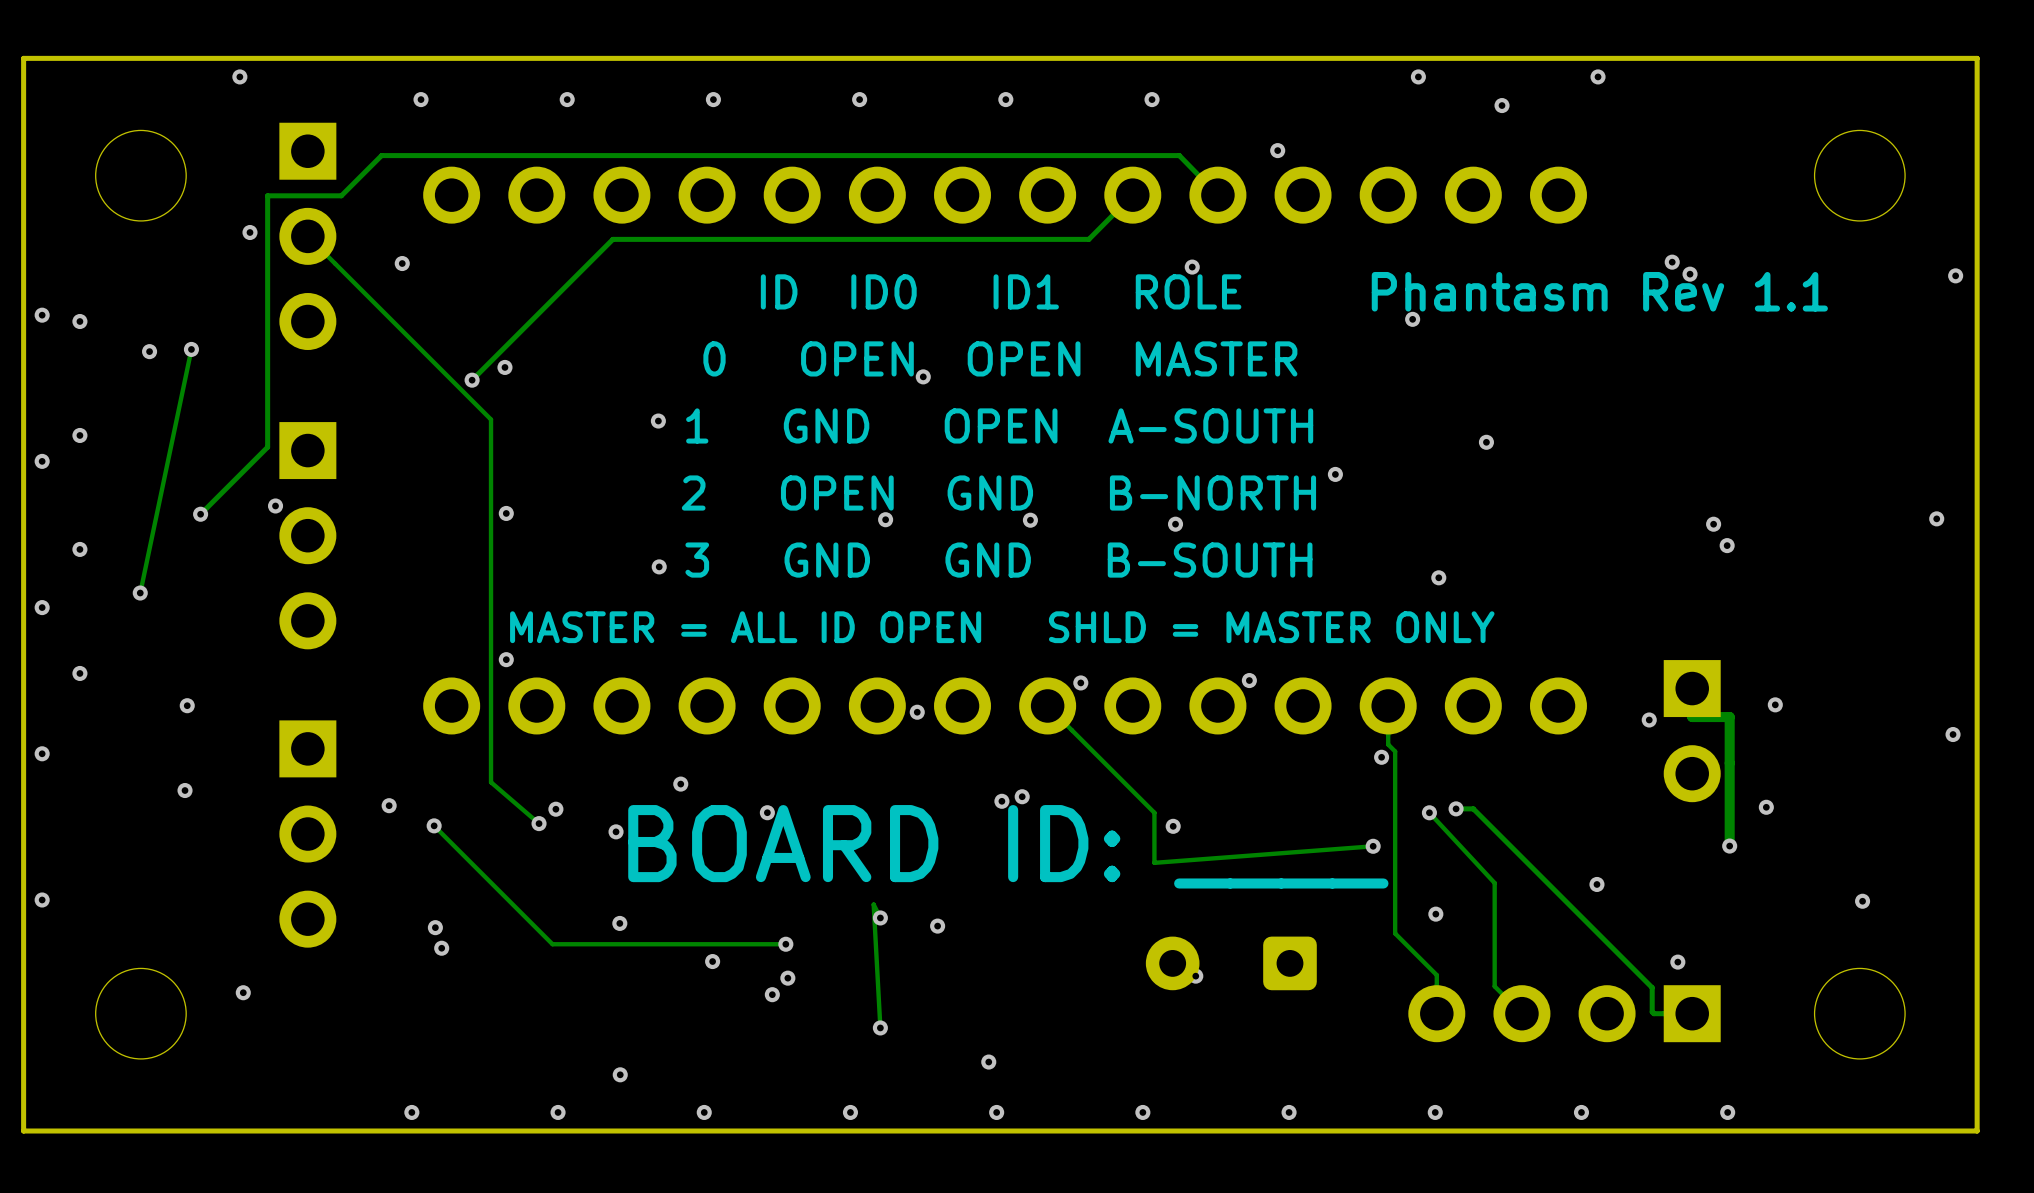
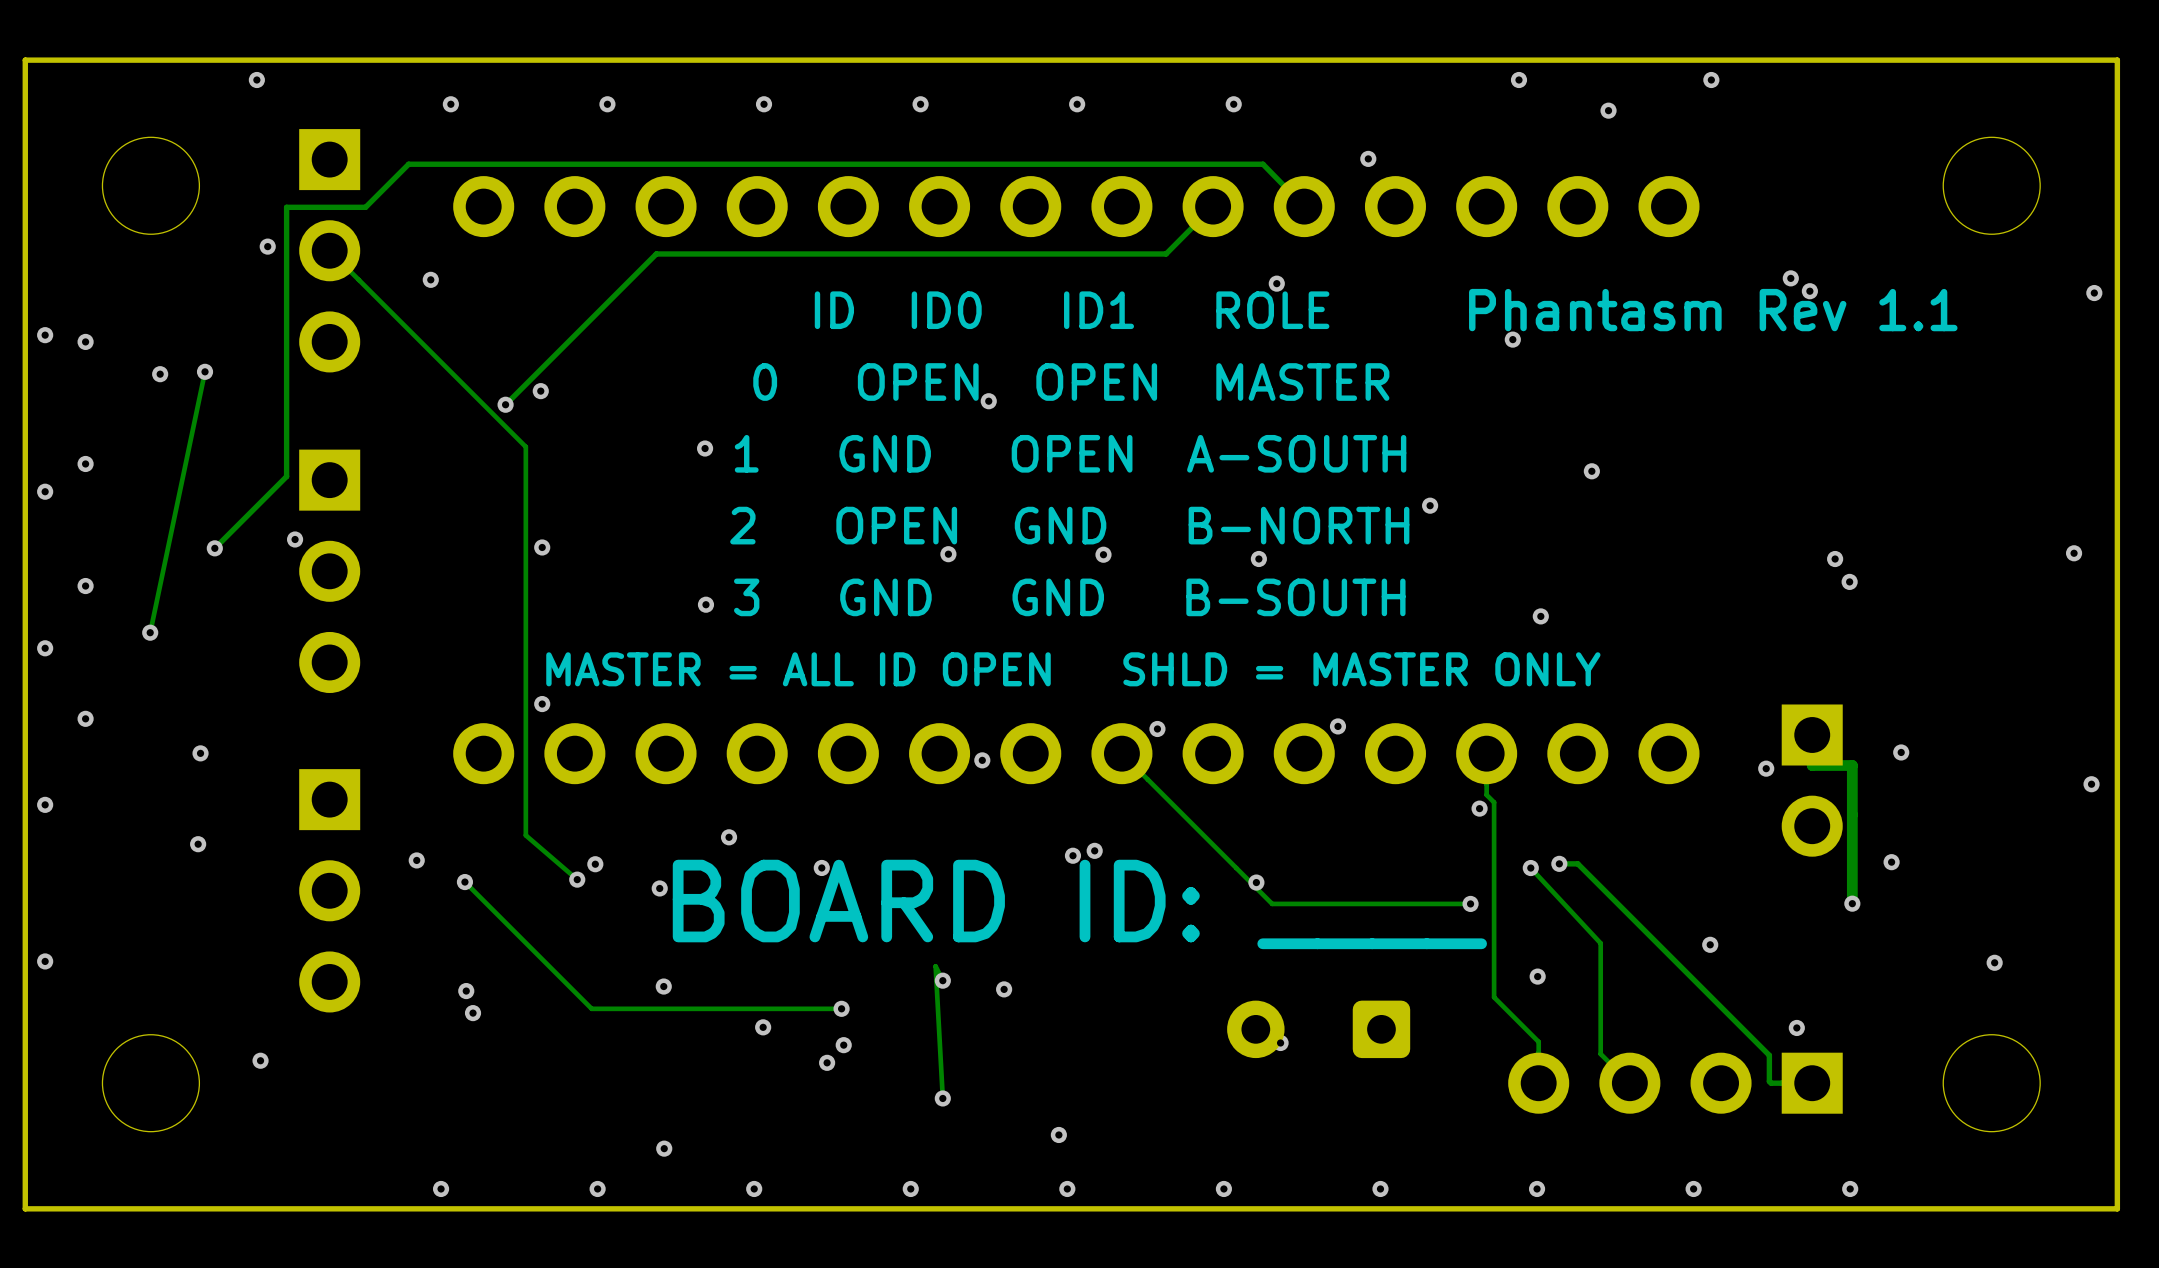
track: (1154, 812) (1154, 862) (1373, 846) -> (1236, 868) (1272, 903) (1470, 903)

